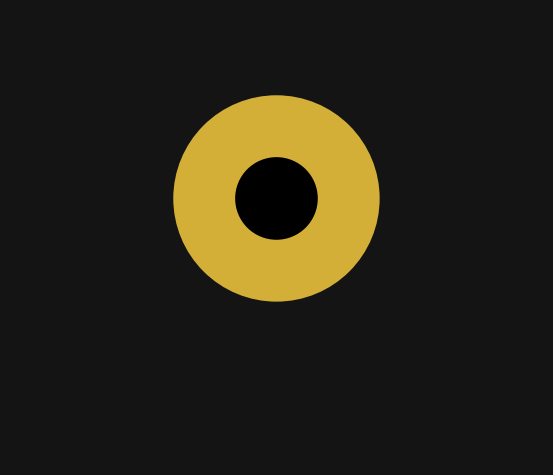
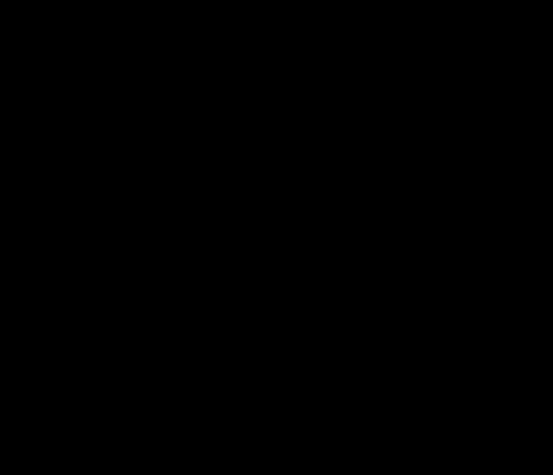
part: (276, 198) -> none

